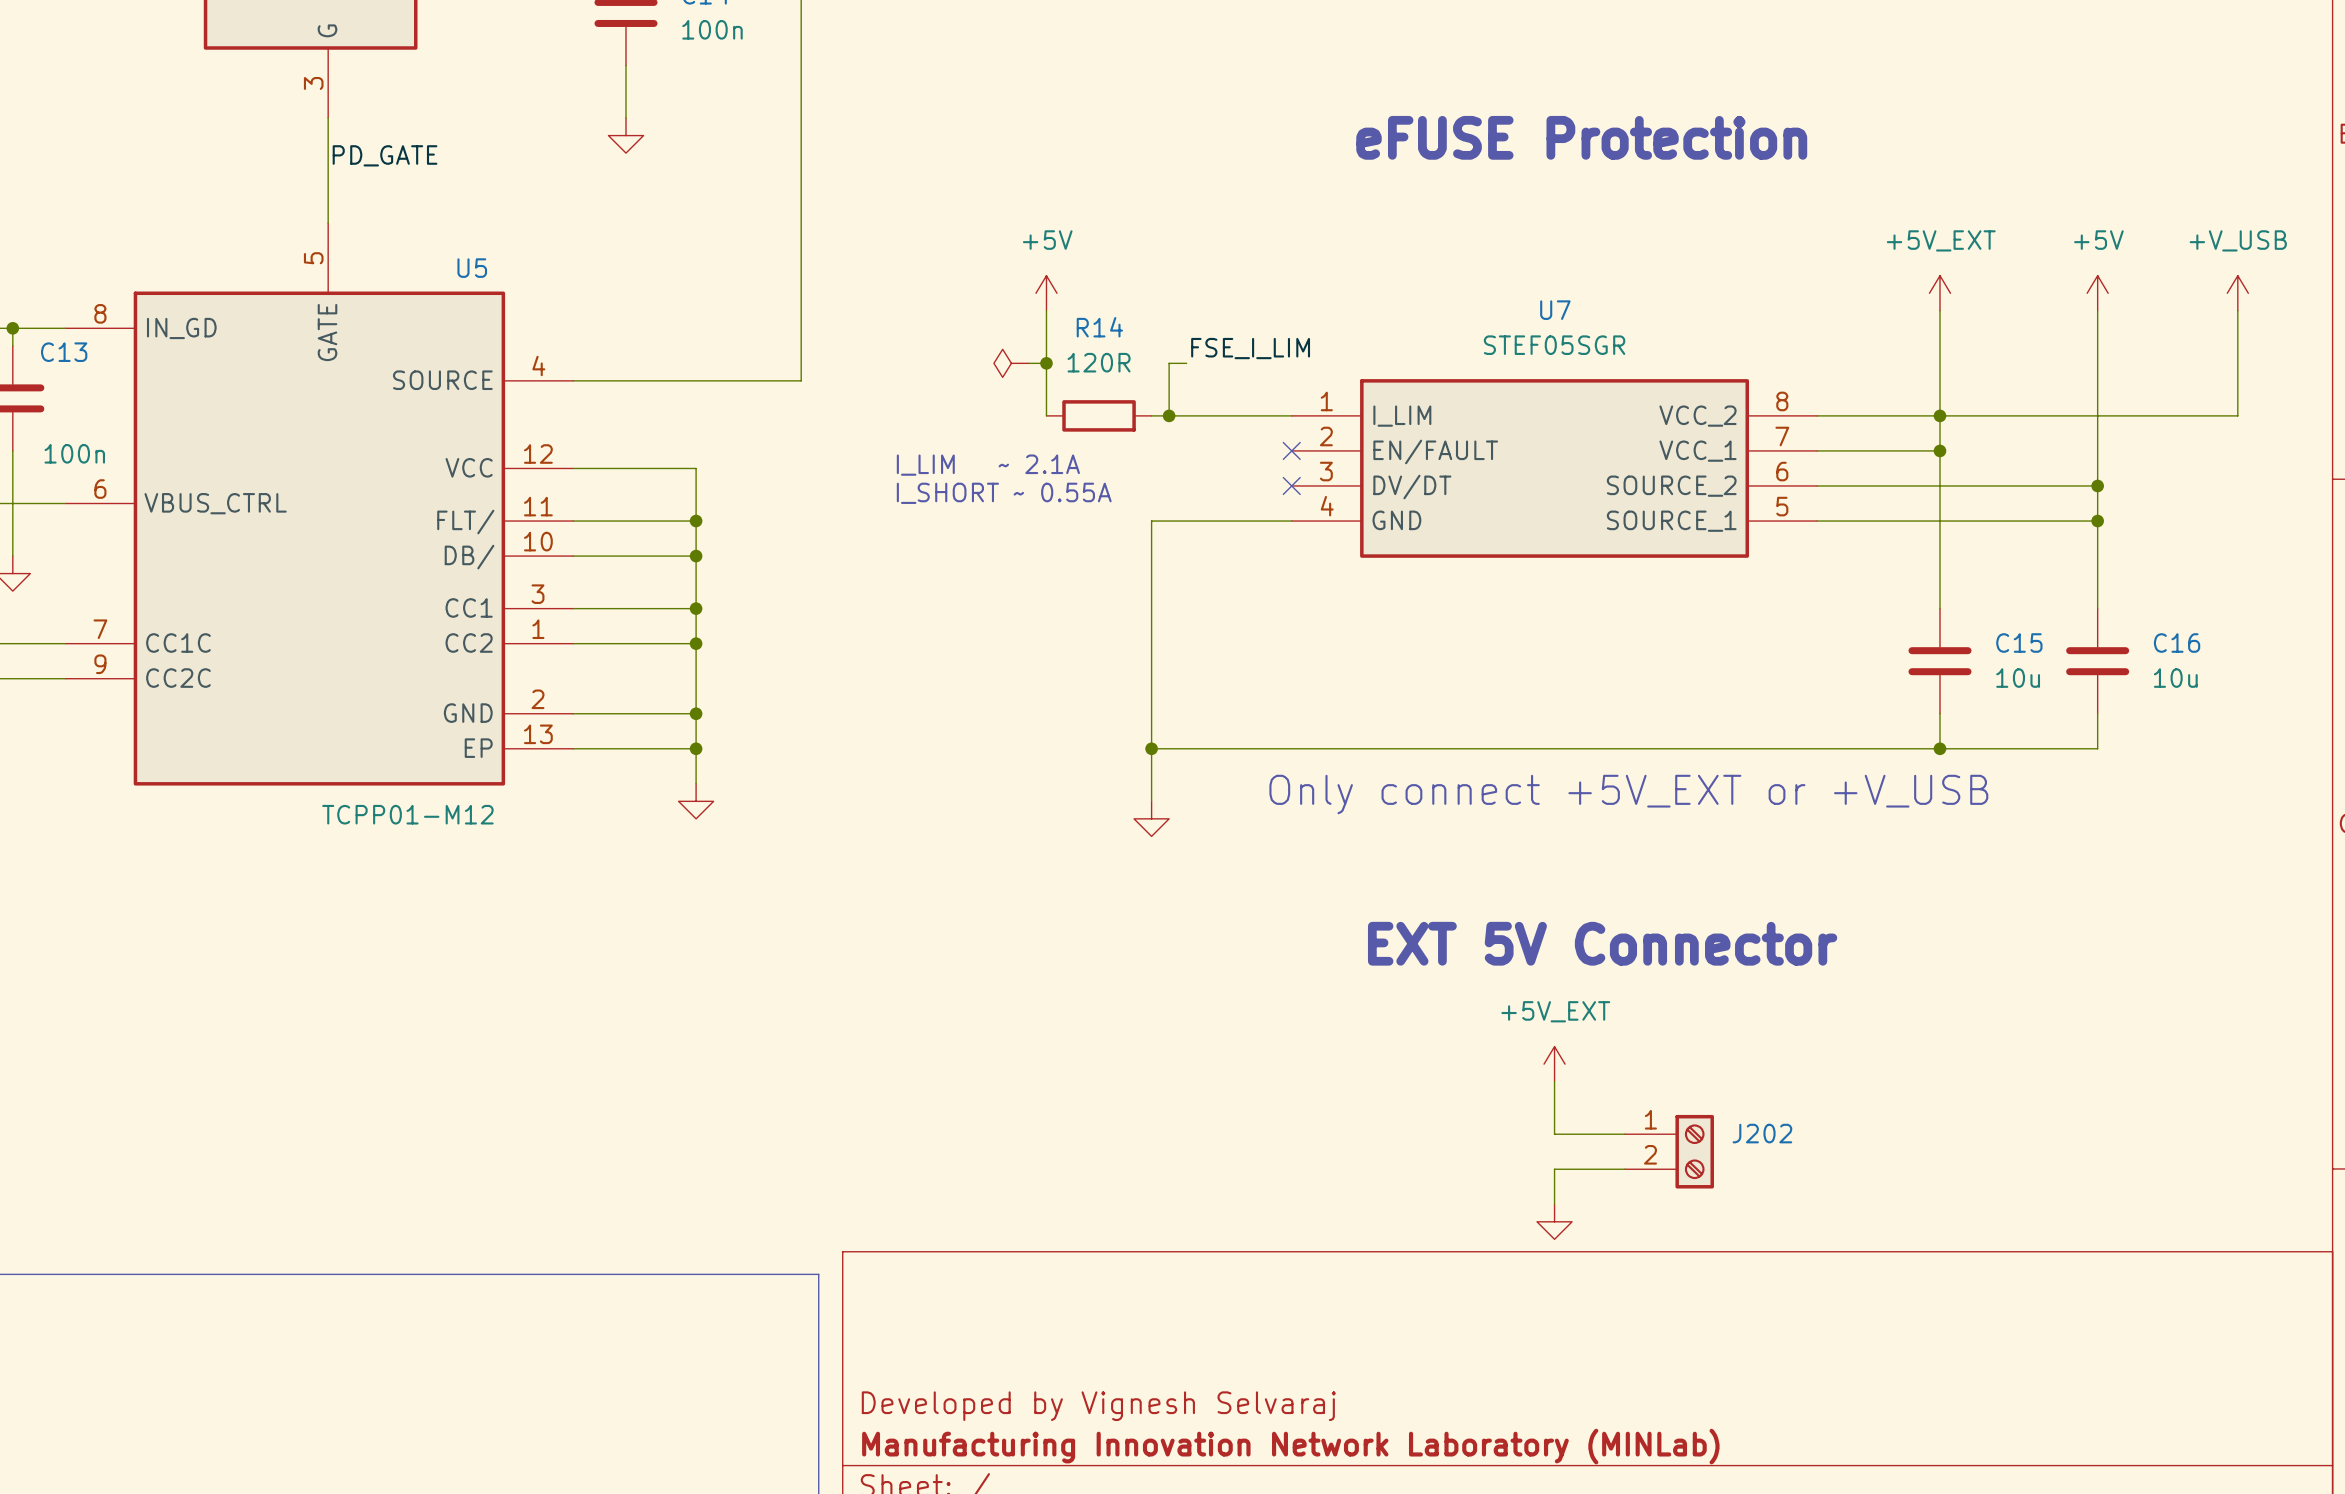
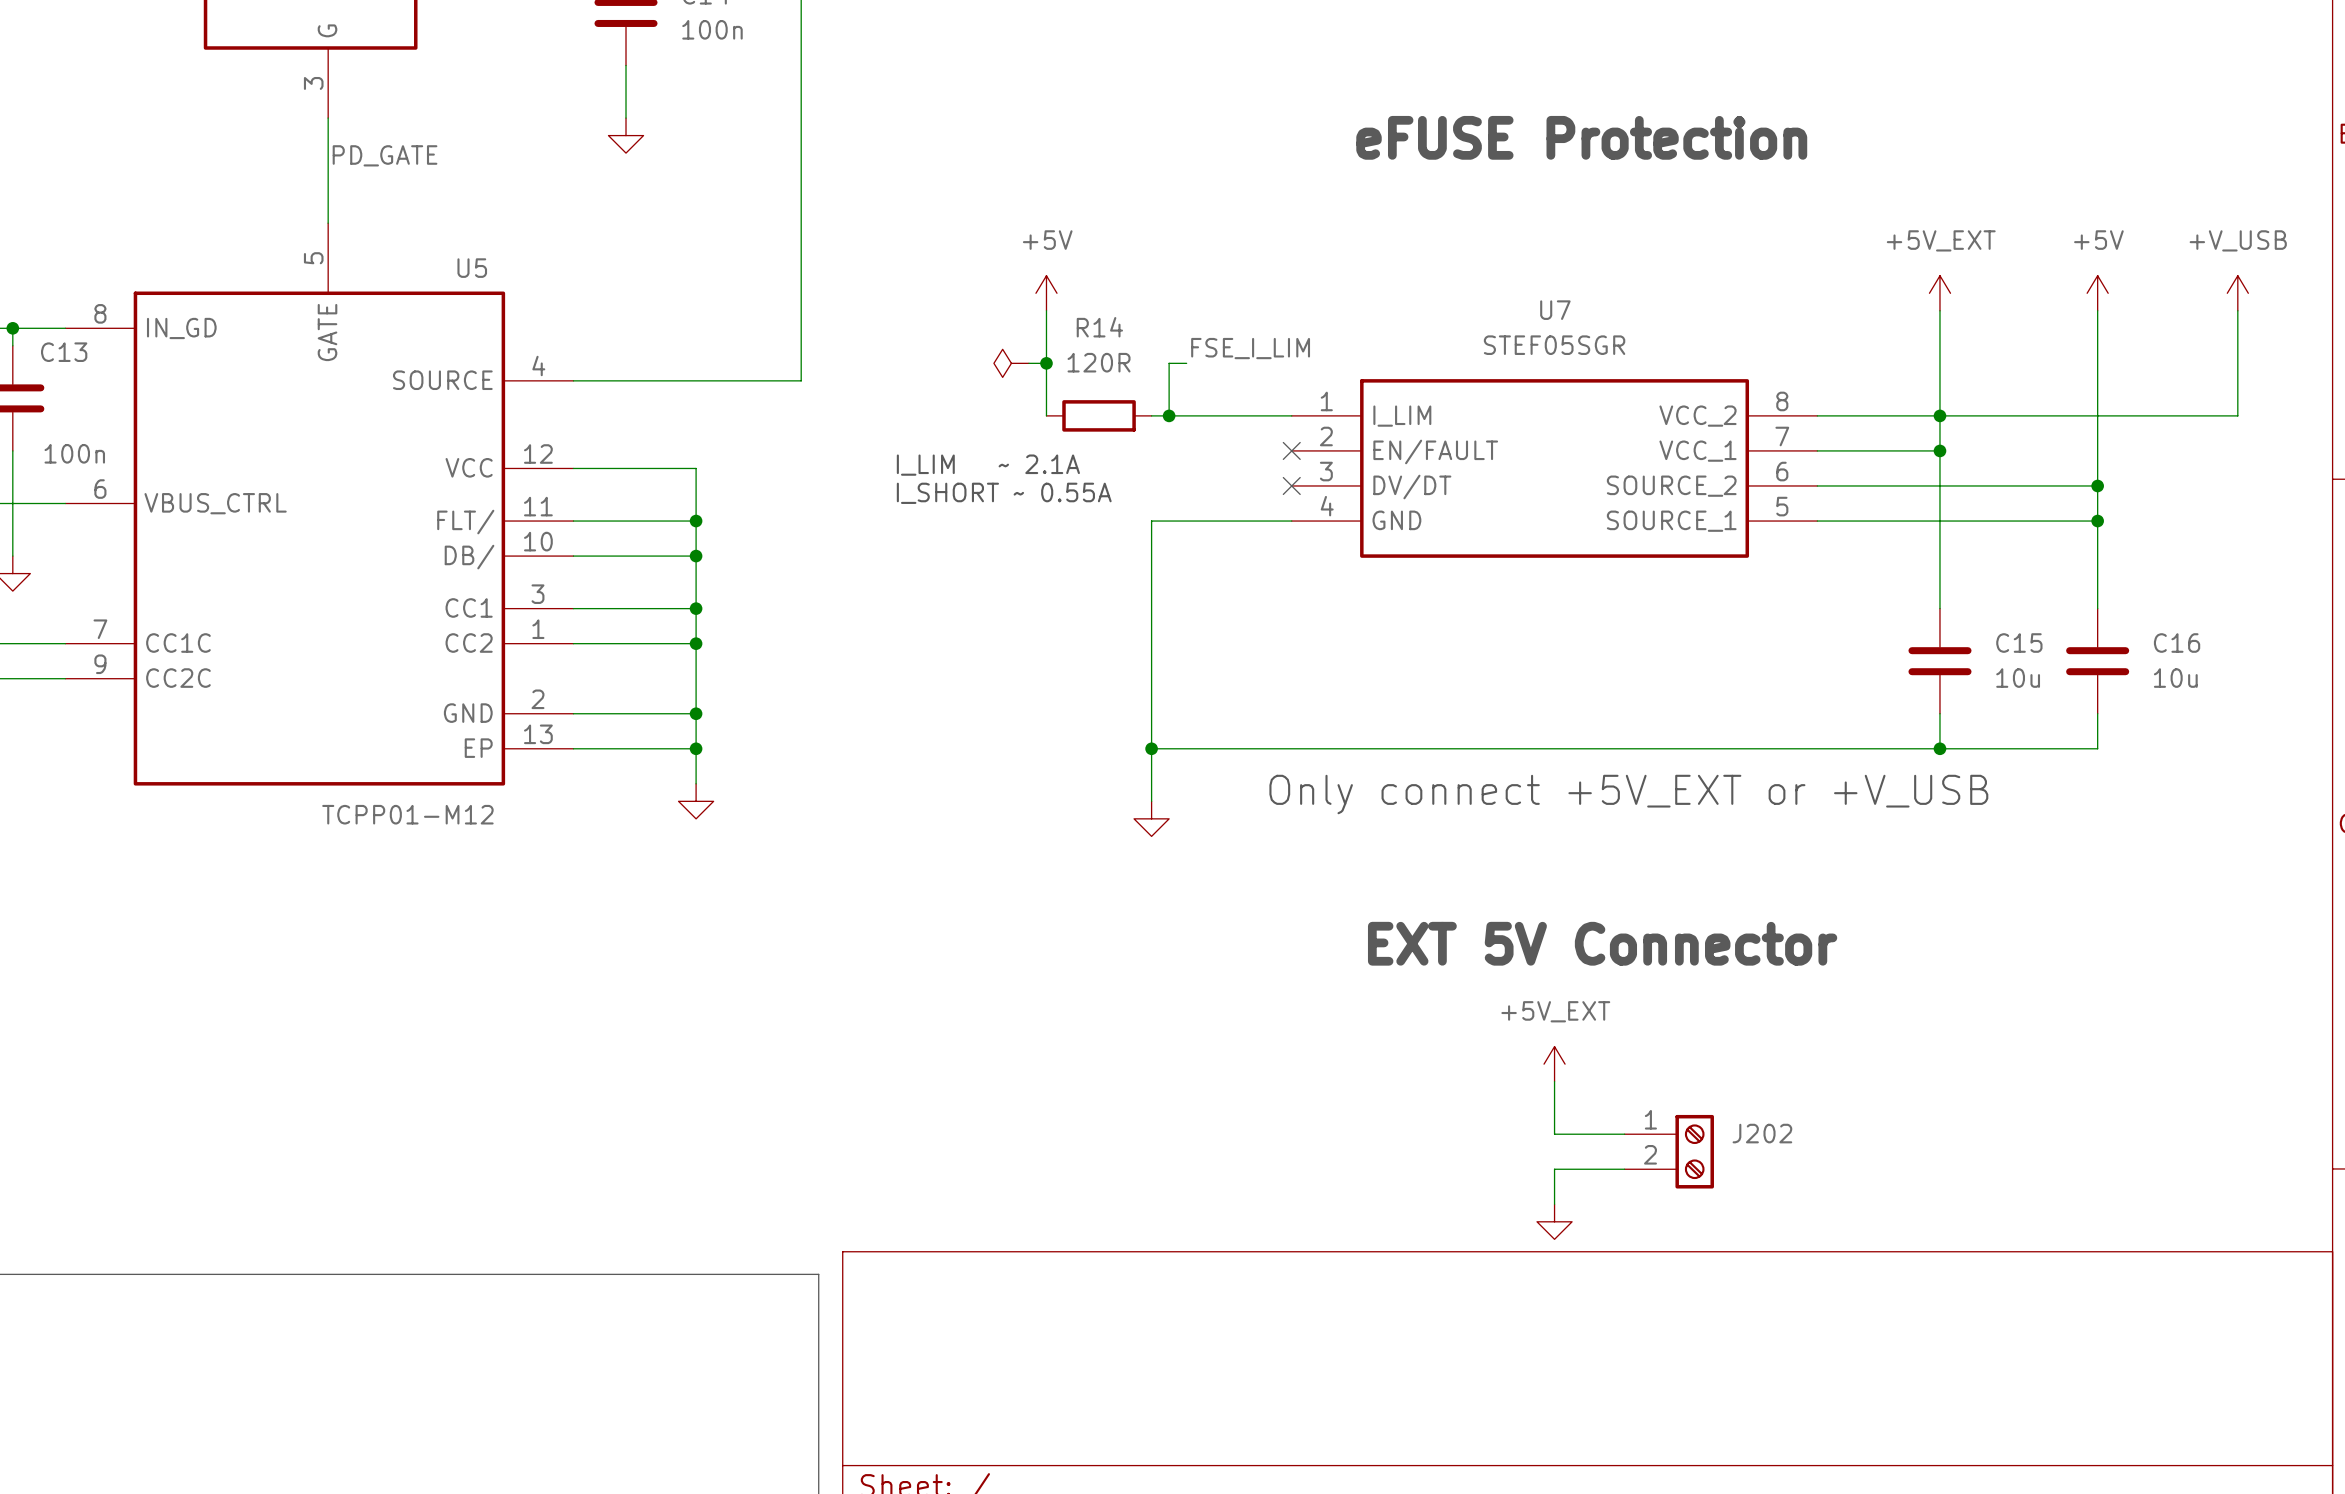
title block: Developed by Vignesh Selvaraj (1098, 1406) -> none
title block: Manufacturing Innovation Network Laboratory (MINLab) (1290, 1446) -> none

